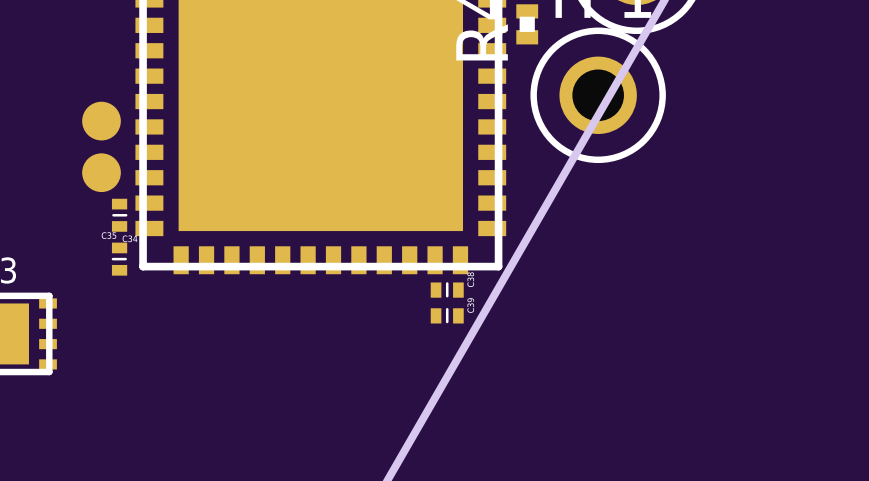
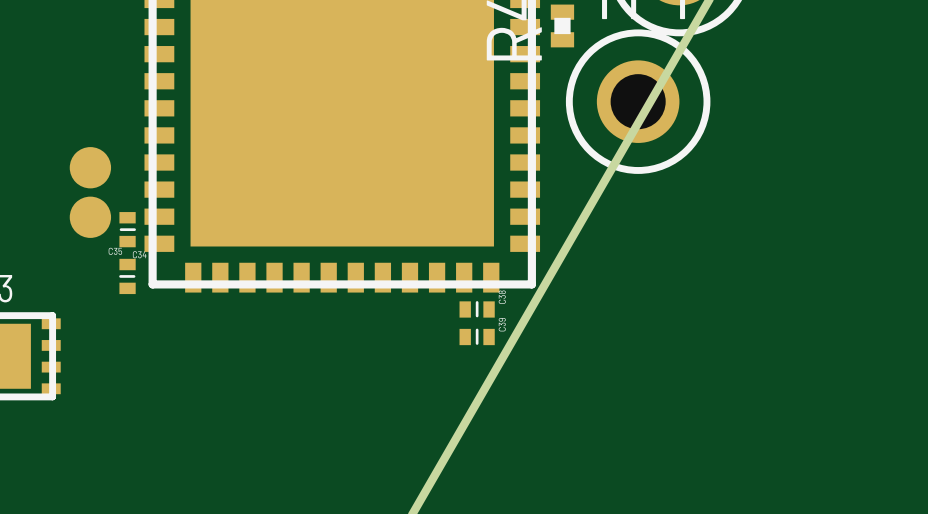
part: (101, 121) -> none
part: none -> (90, 167)
part: (101, 172) -> none
part: none -> (90, 217)

